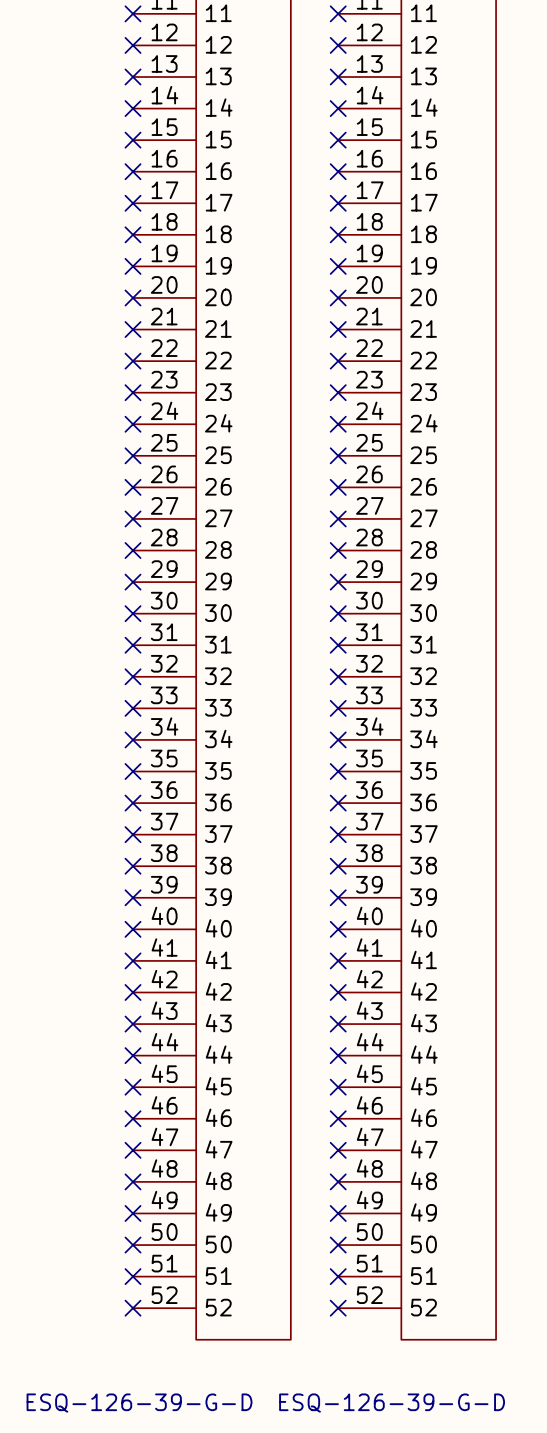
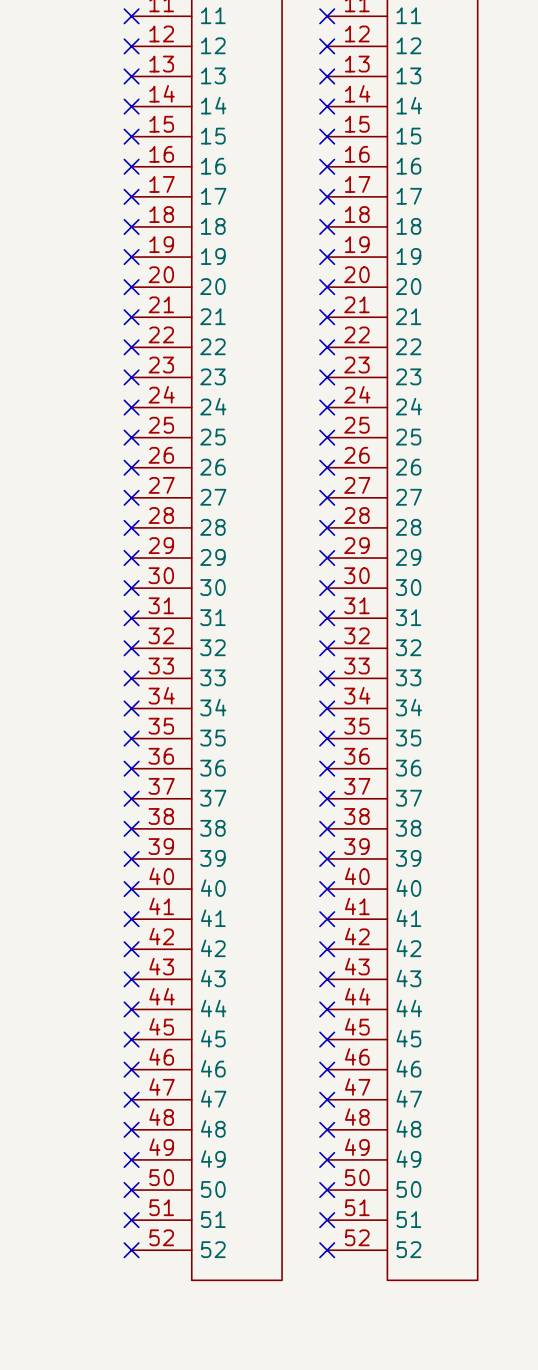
part value: ESQ-126-39-G-D (139, 1403) -> none
part value: ESQ-126-39-G-D (392, 1403) -> none

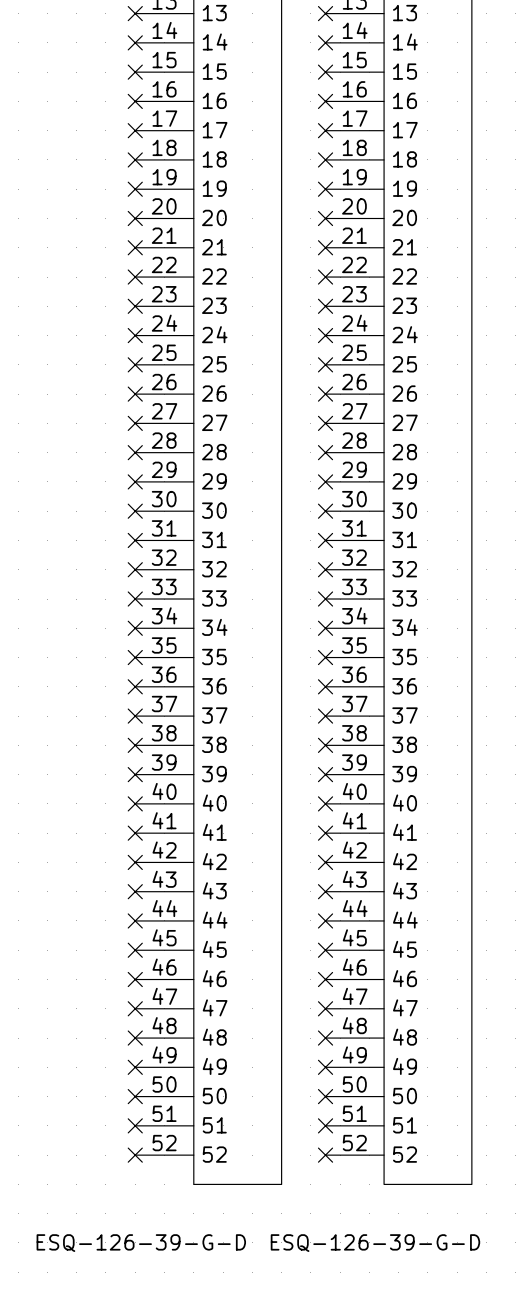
part value: none -> ESQ-126-39-G-D (141, 1243)
part value: none -> ESQ-126-39-G-D (375, 1243)

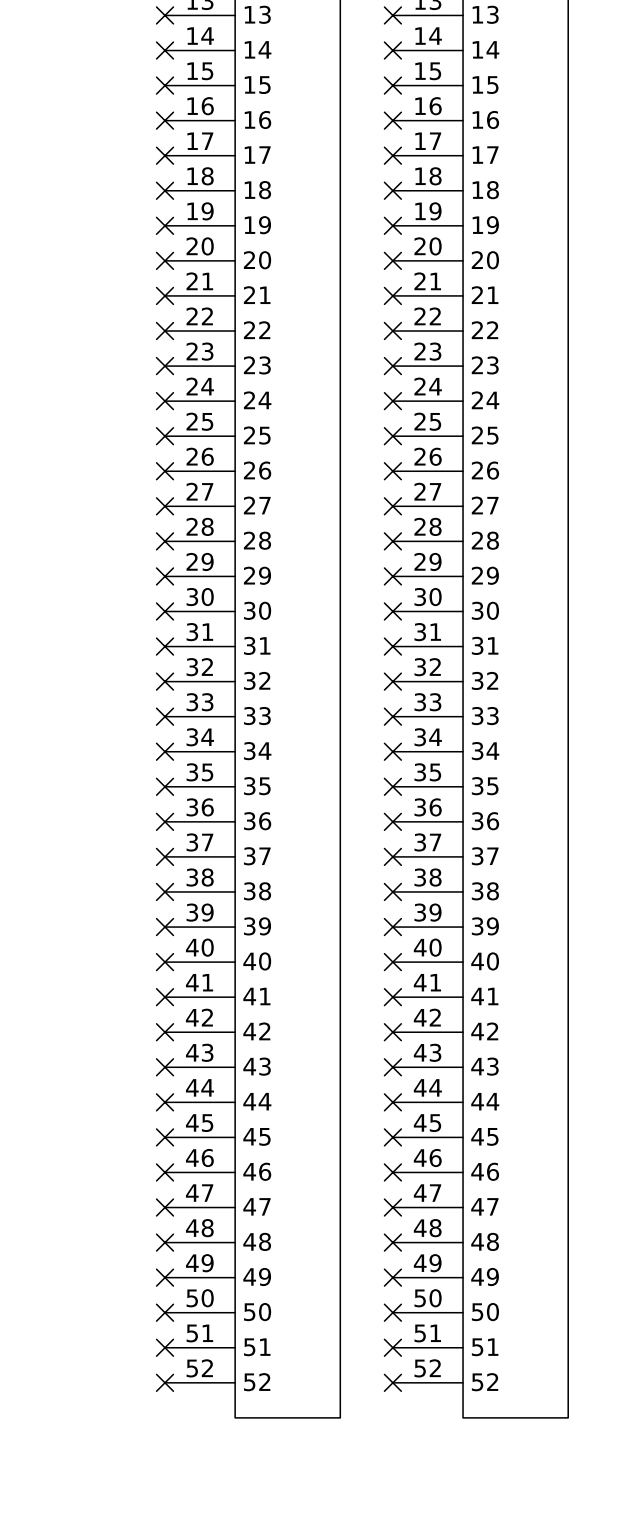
part value: ESQ-126-39-G-D (141, 1243) -> none
part value: ESQ-126-39-G-D (375, 1243) -> none

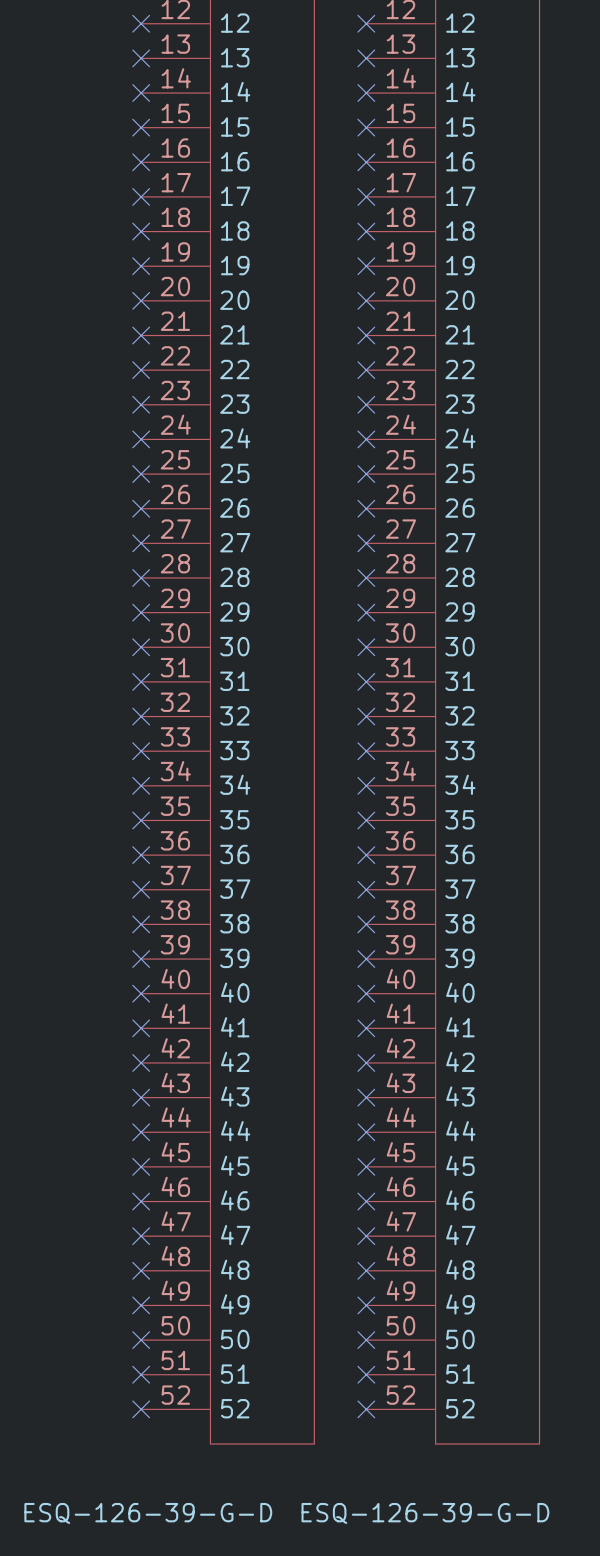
part value: none -> ESQ-126-39-G-D (148, 1513)
part value: none -> ESQ-126-39-G-D (425, 1513)

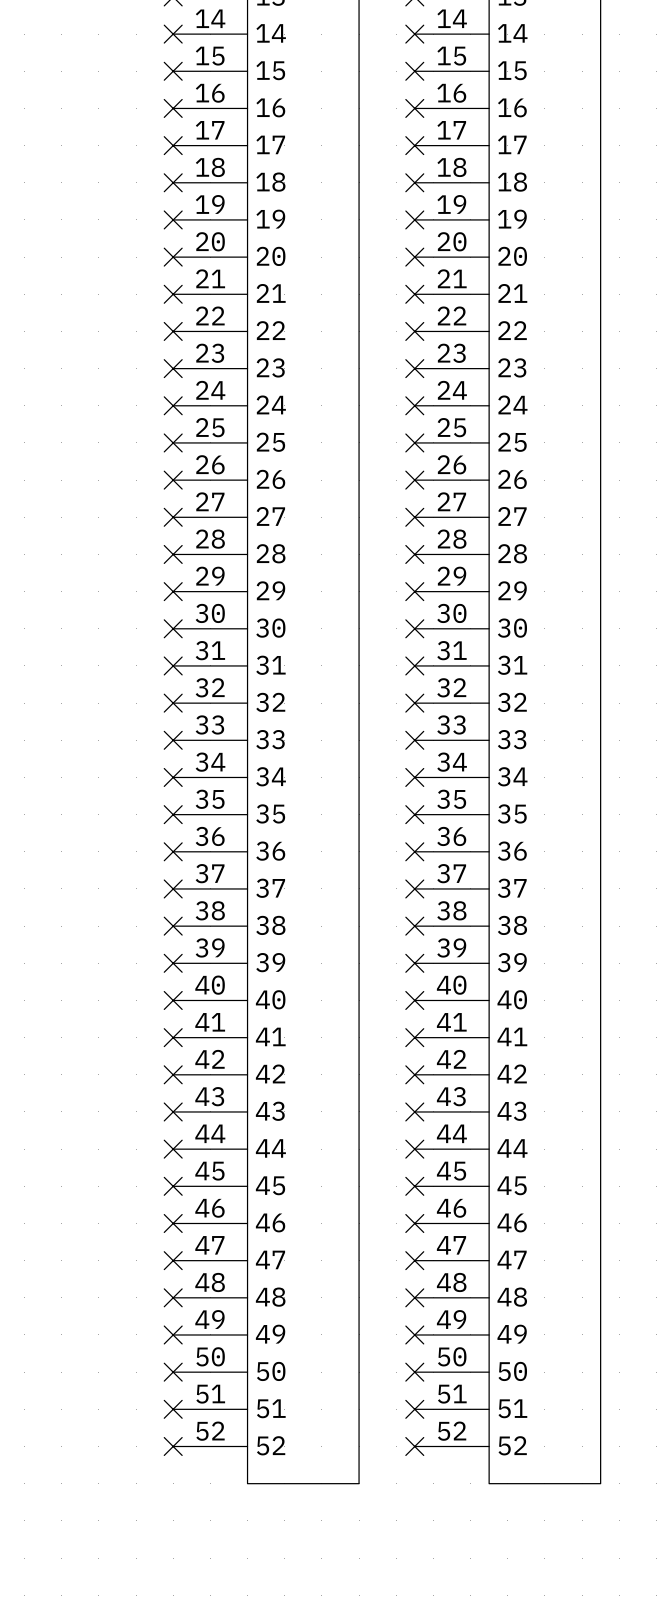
part value: ESQ-126-39-G-D (148, 1513) -> none
part value: ESQ-126-39-G-D (425, 1513) -> none

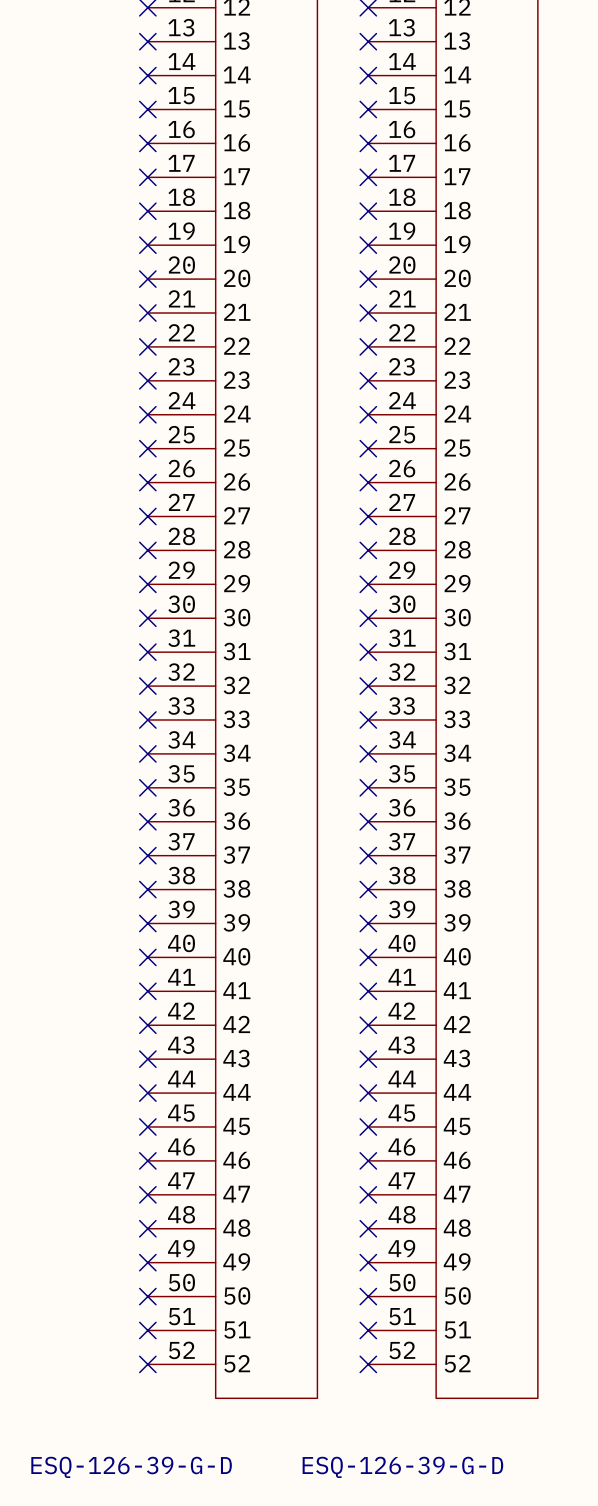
part value: none -> ESQ-126-39-G-D (131, 1467)
part value: none -> ESQ-126-39-G-D (402, 1467)

